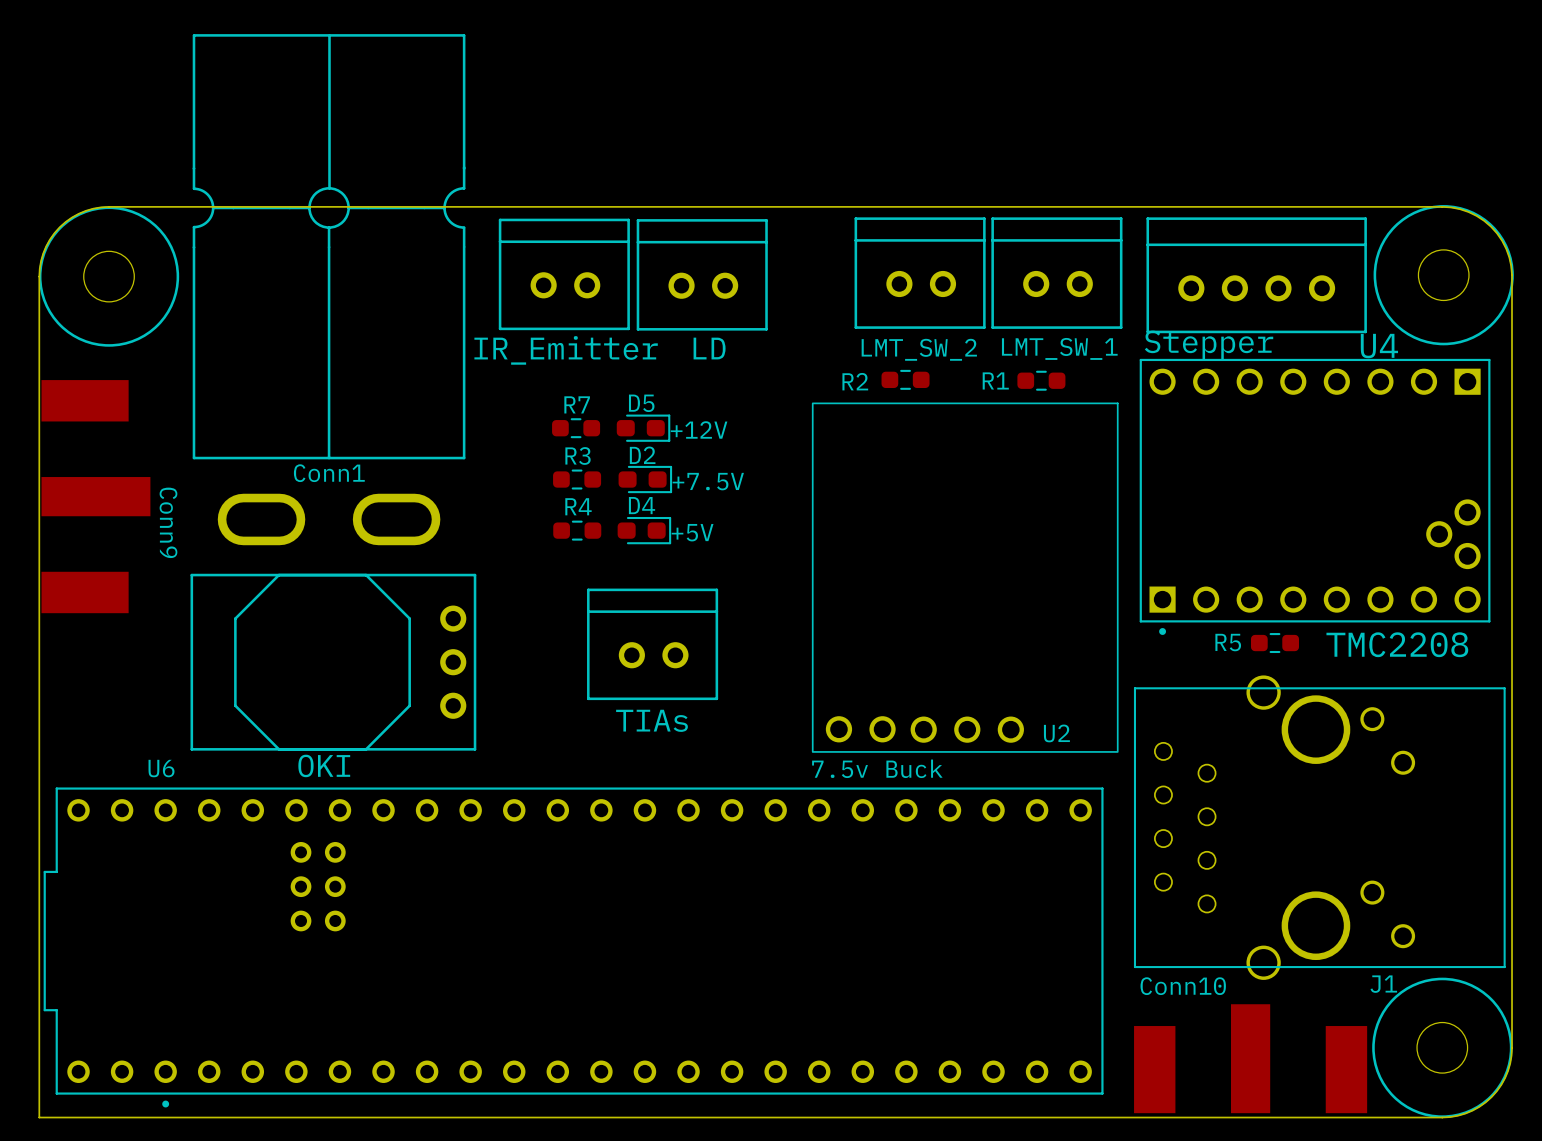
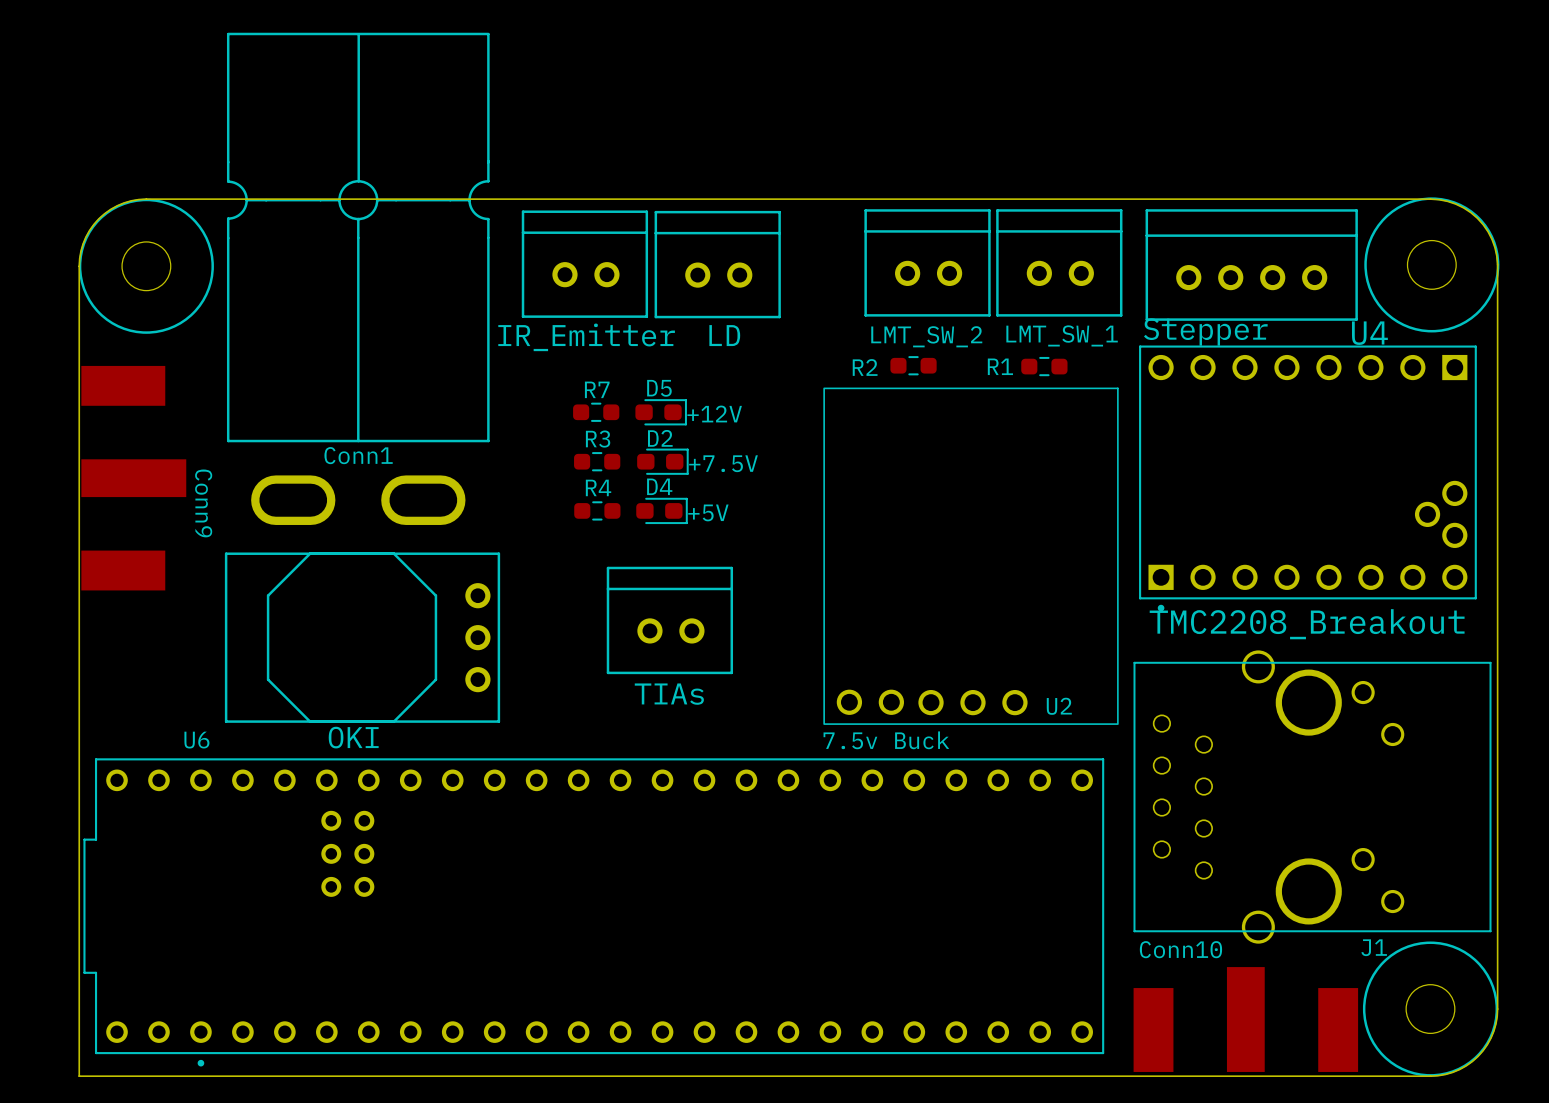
R5: (1274, 643) -> none
U4 value: TMC2208 (1397, 644) -> TMC2208_Breakout (1307, 624)

